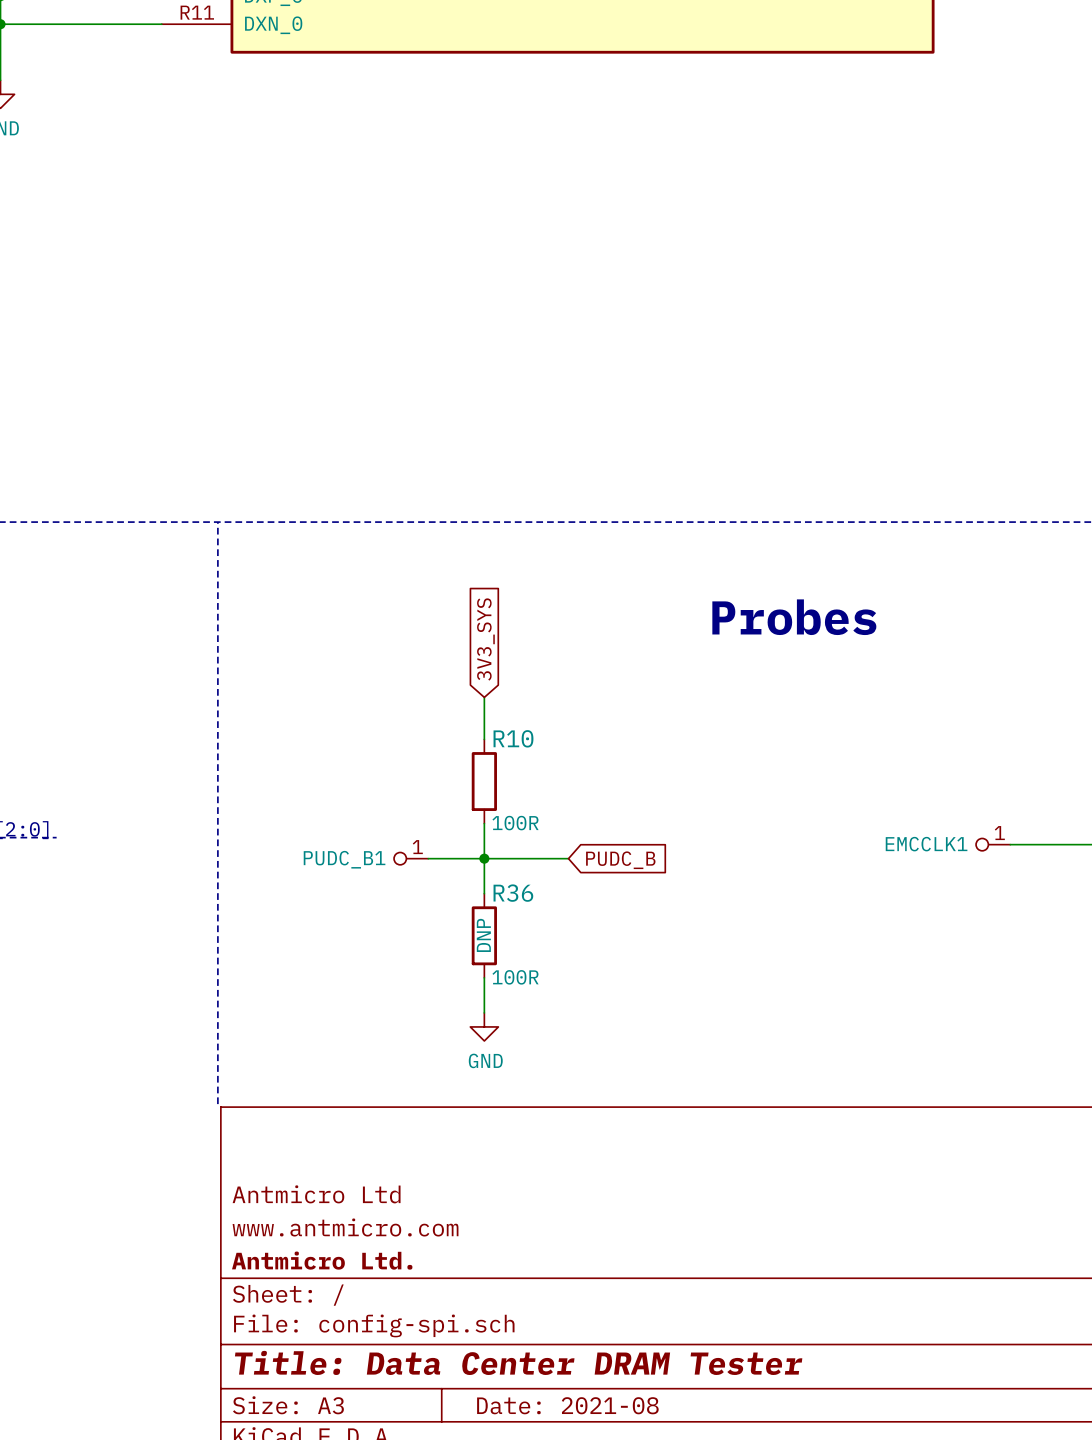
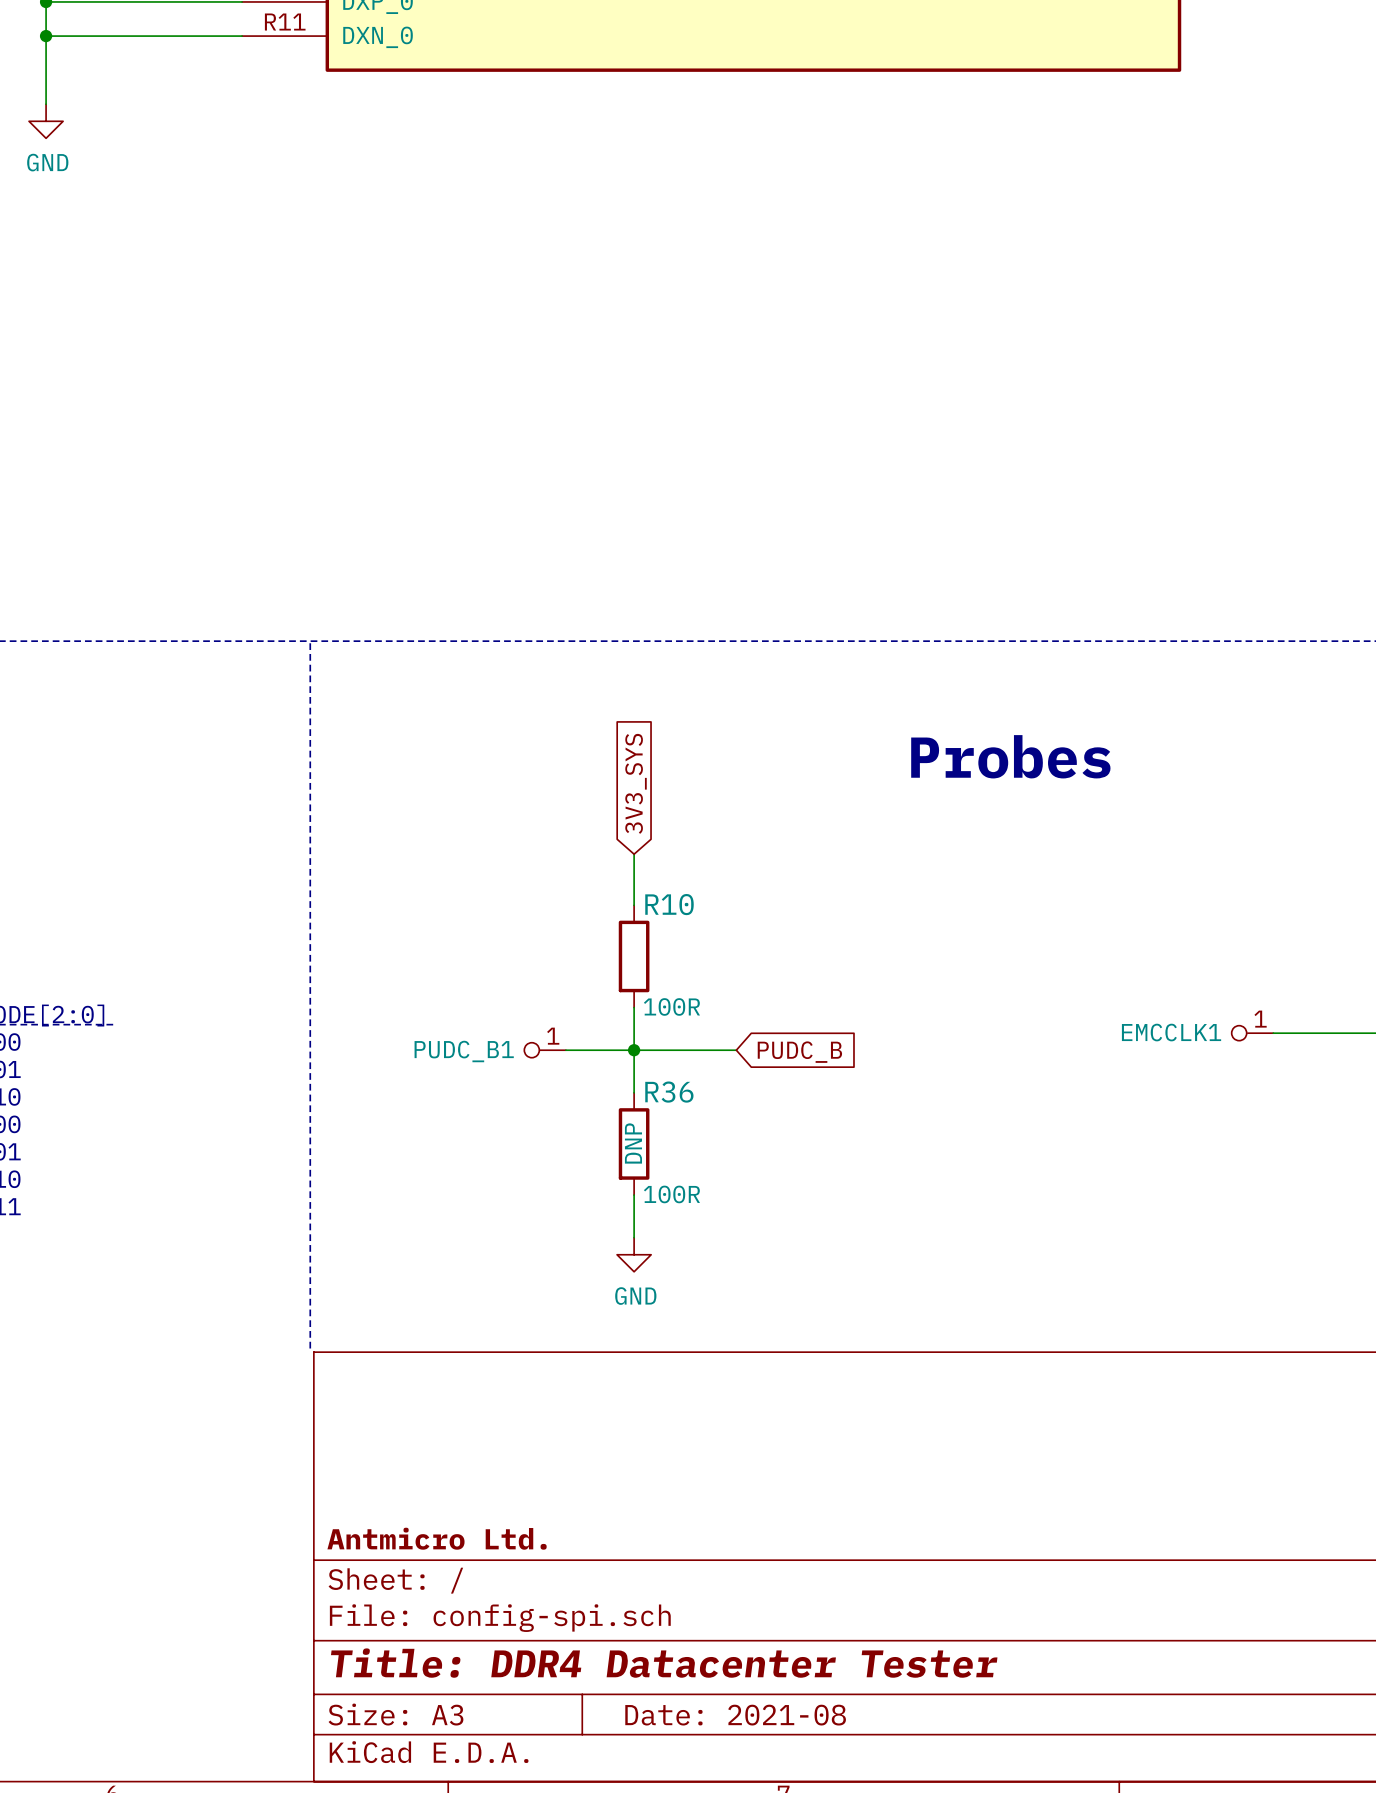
title block: Antmicro Ltd (316, 1194) -> none
title block: www.antmicro.com (345, 1227) -> none
title block: Title: Data Center DRAM Tester (518, 1362) -> Title: DDR4 Datacenter Tester (664, 1663)

